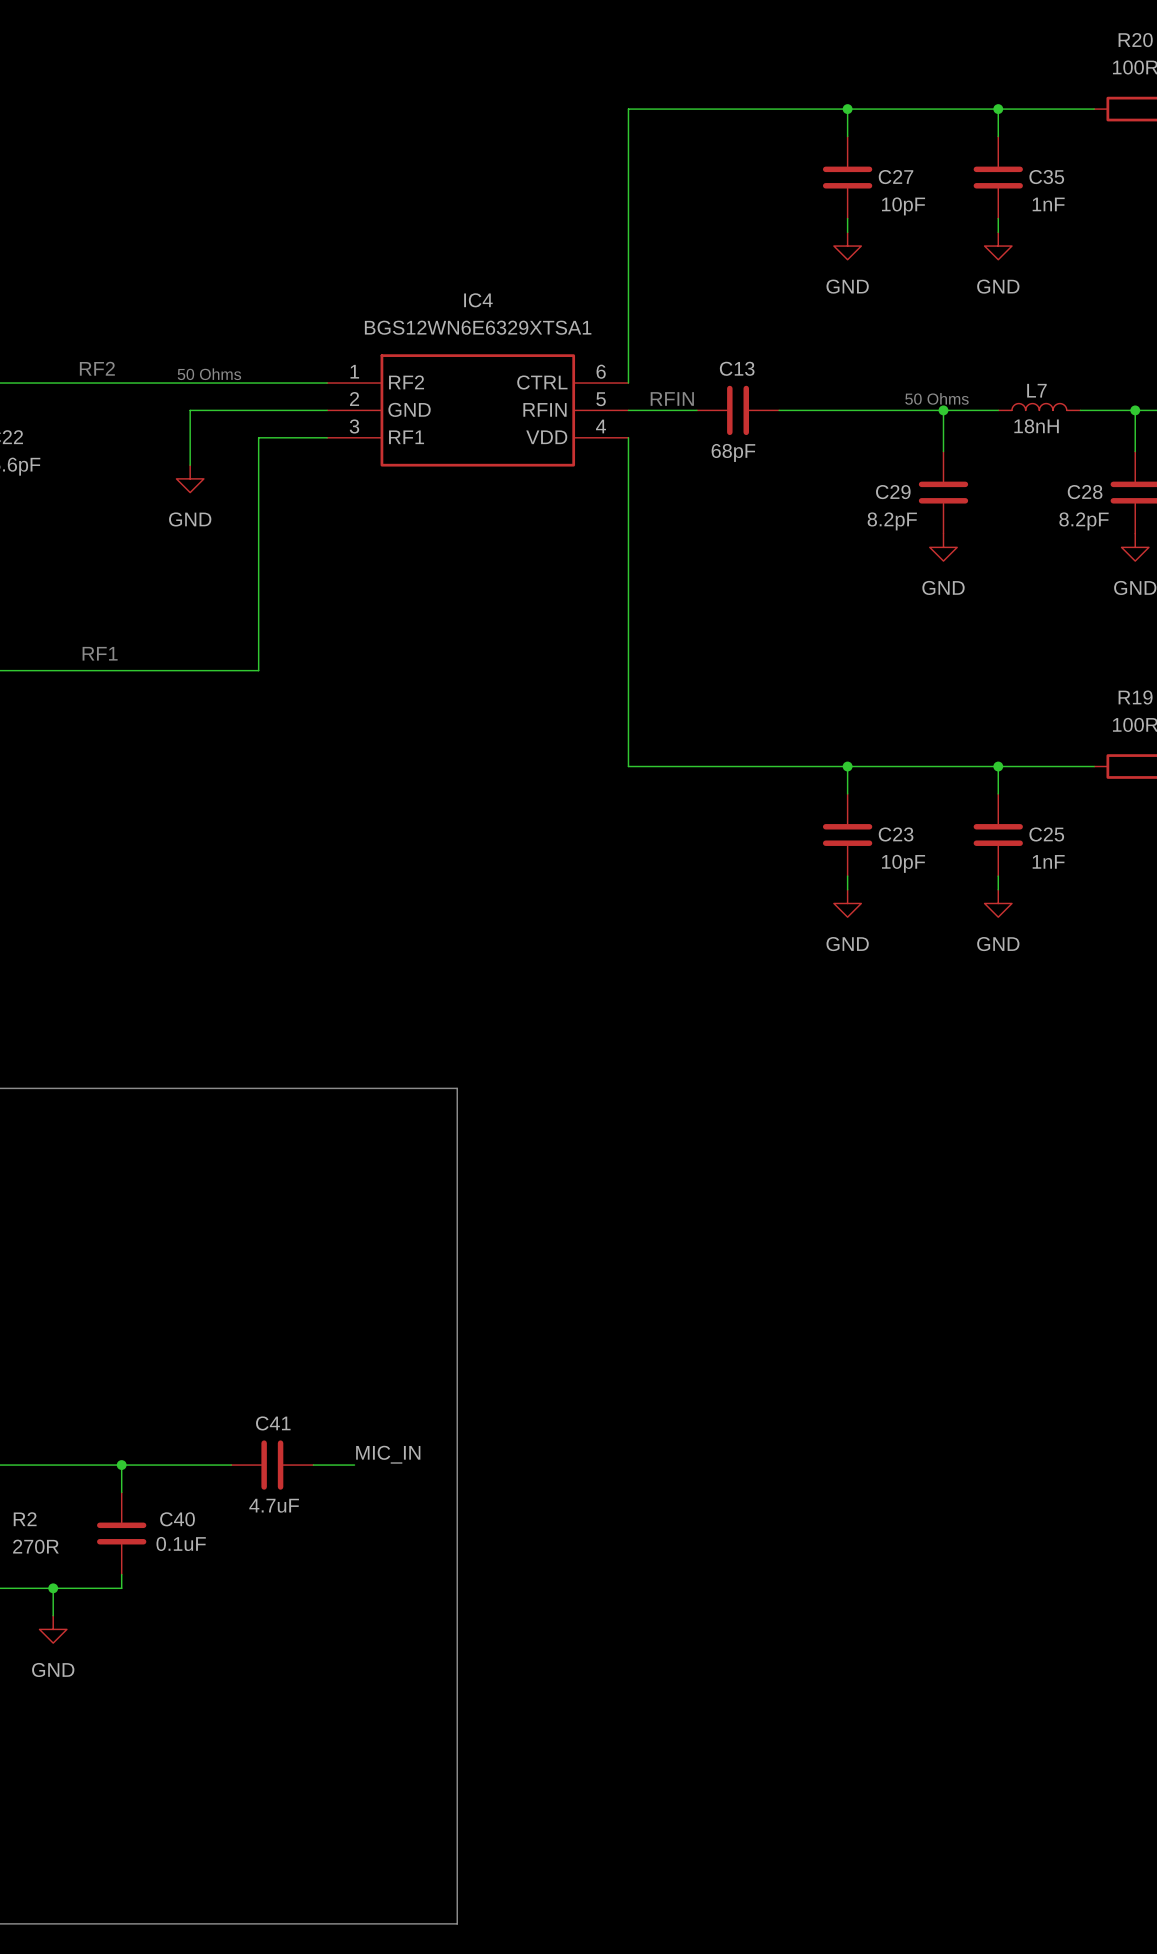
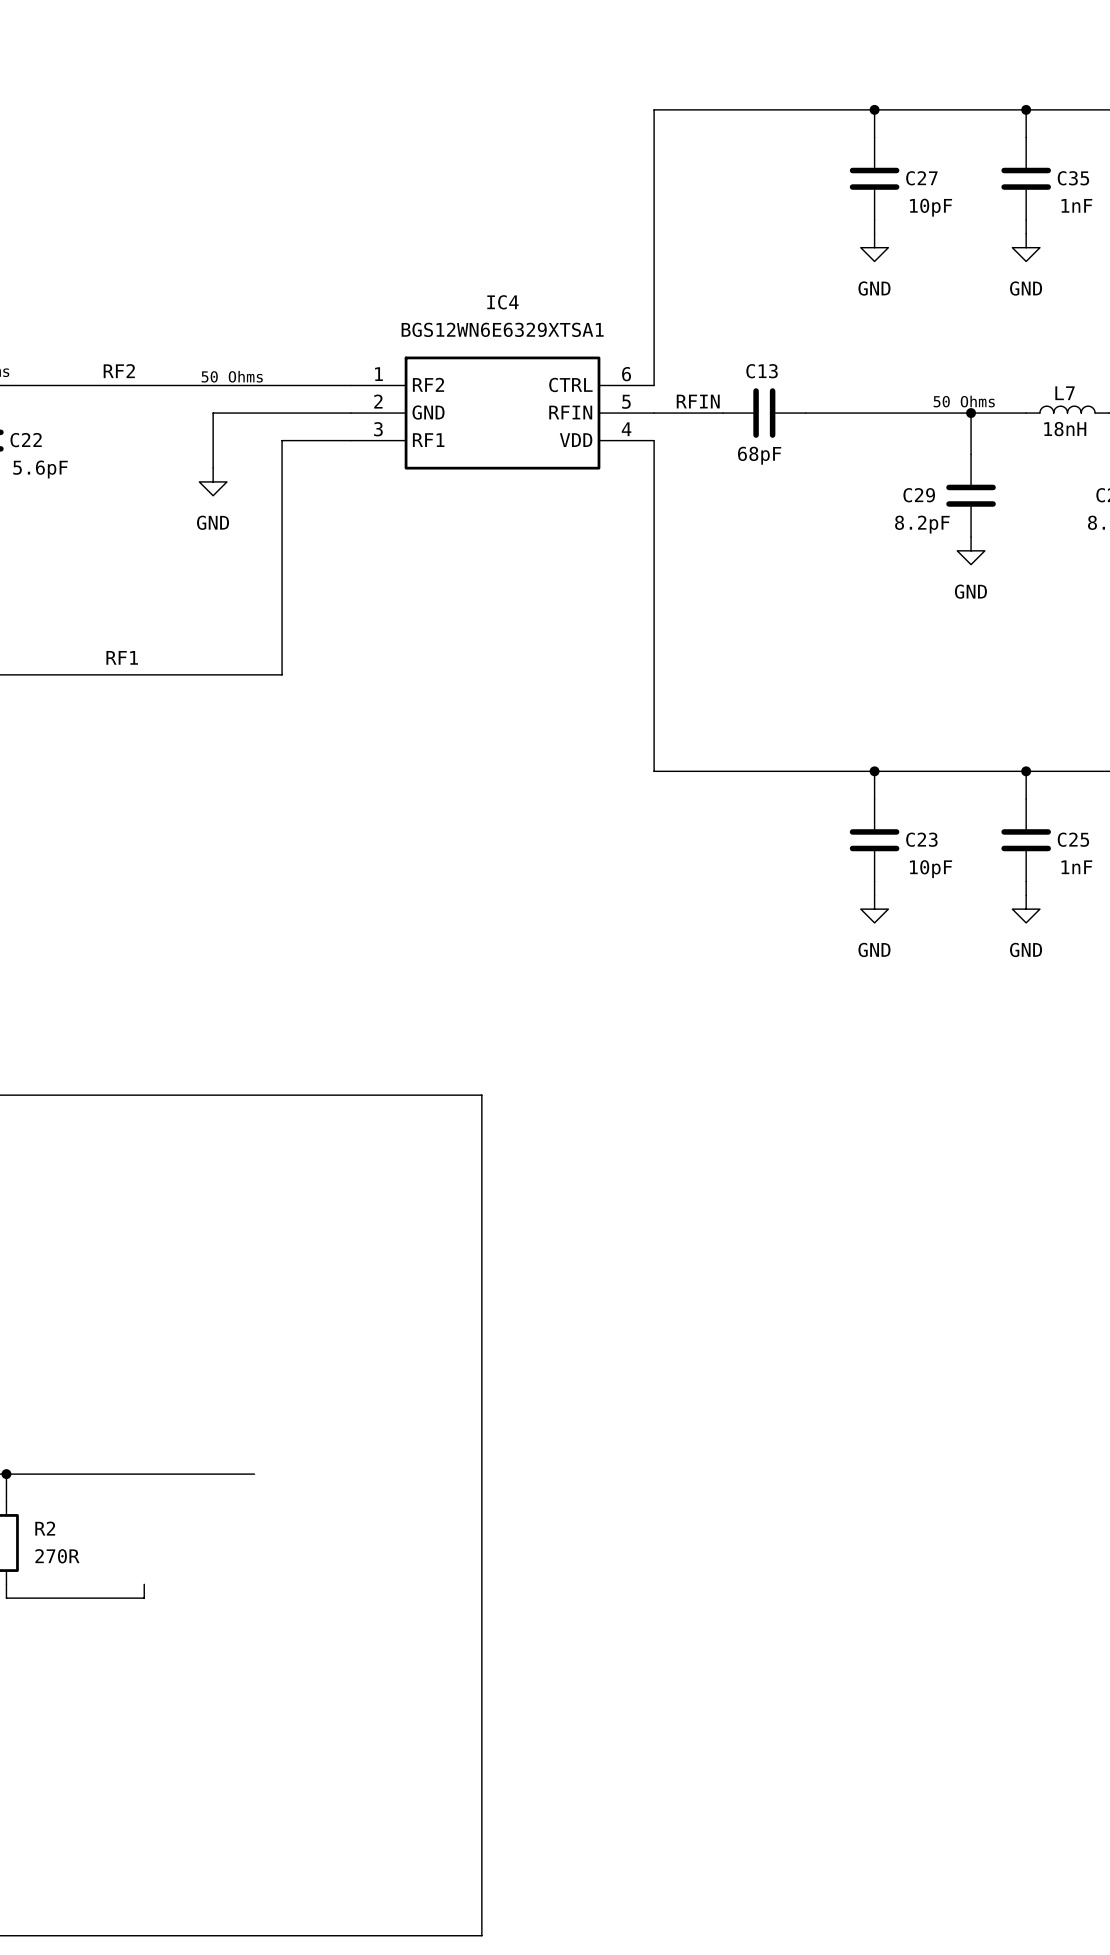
label: MIC_IN (388, 1454) -> none
wire: (121, 1465) (121, 1492) -> none
junction: (121, 1465) -> none
C41: 4.7uF (272, 1465) -> none
wire: (313, 1465) (354, 1465) -> none
C40: 0.1uF (121, 1533) -> none
wire: (53, 1588) (53, 1615) -> none
junction: (53, 1588) -> none
power symbol: GND (53, 1629) -> none

